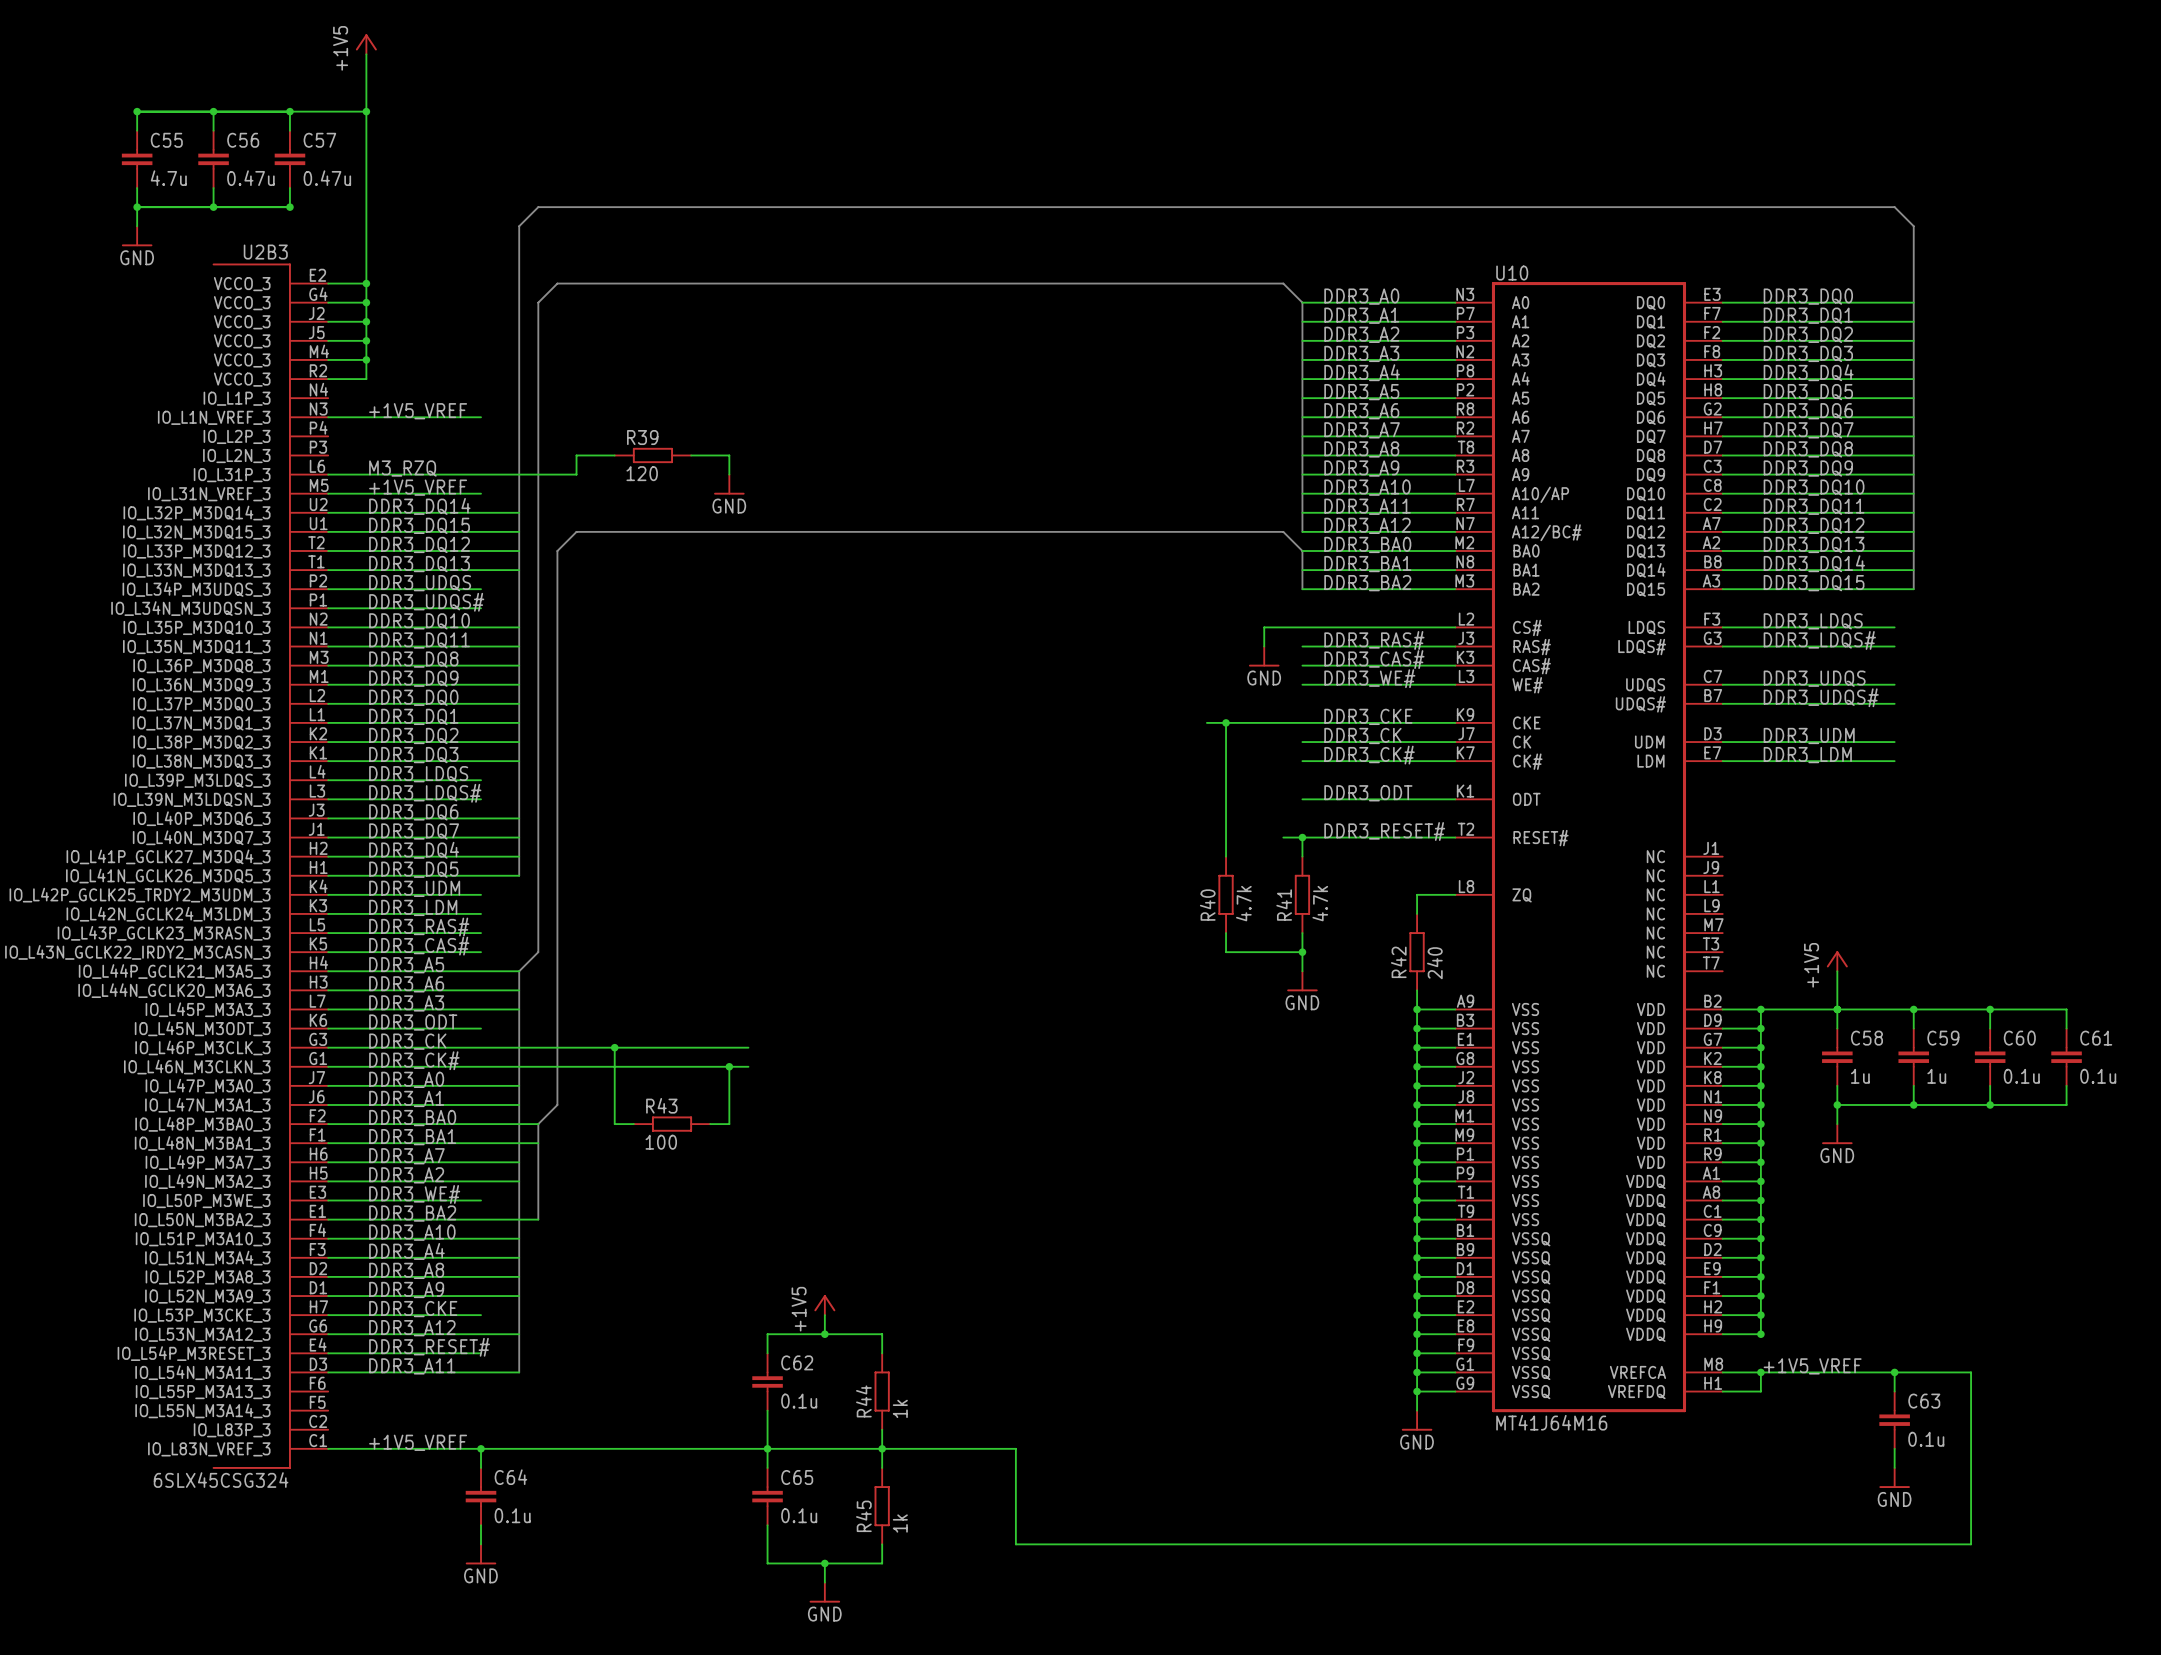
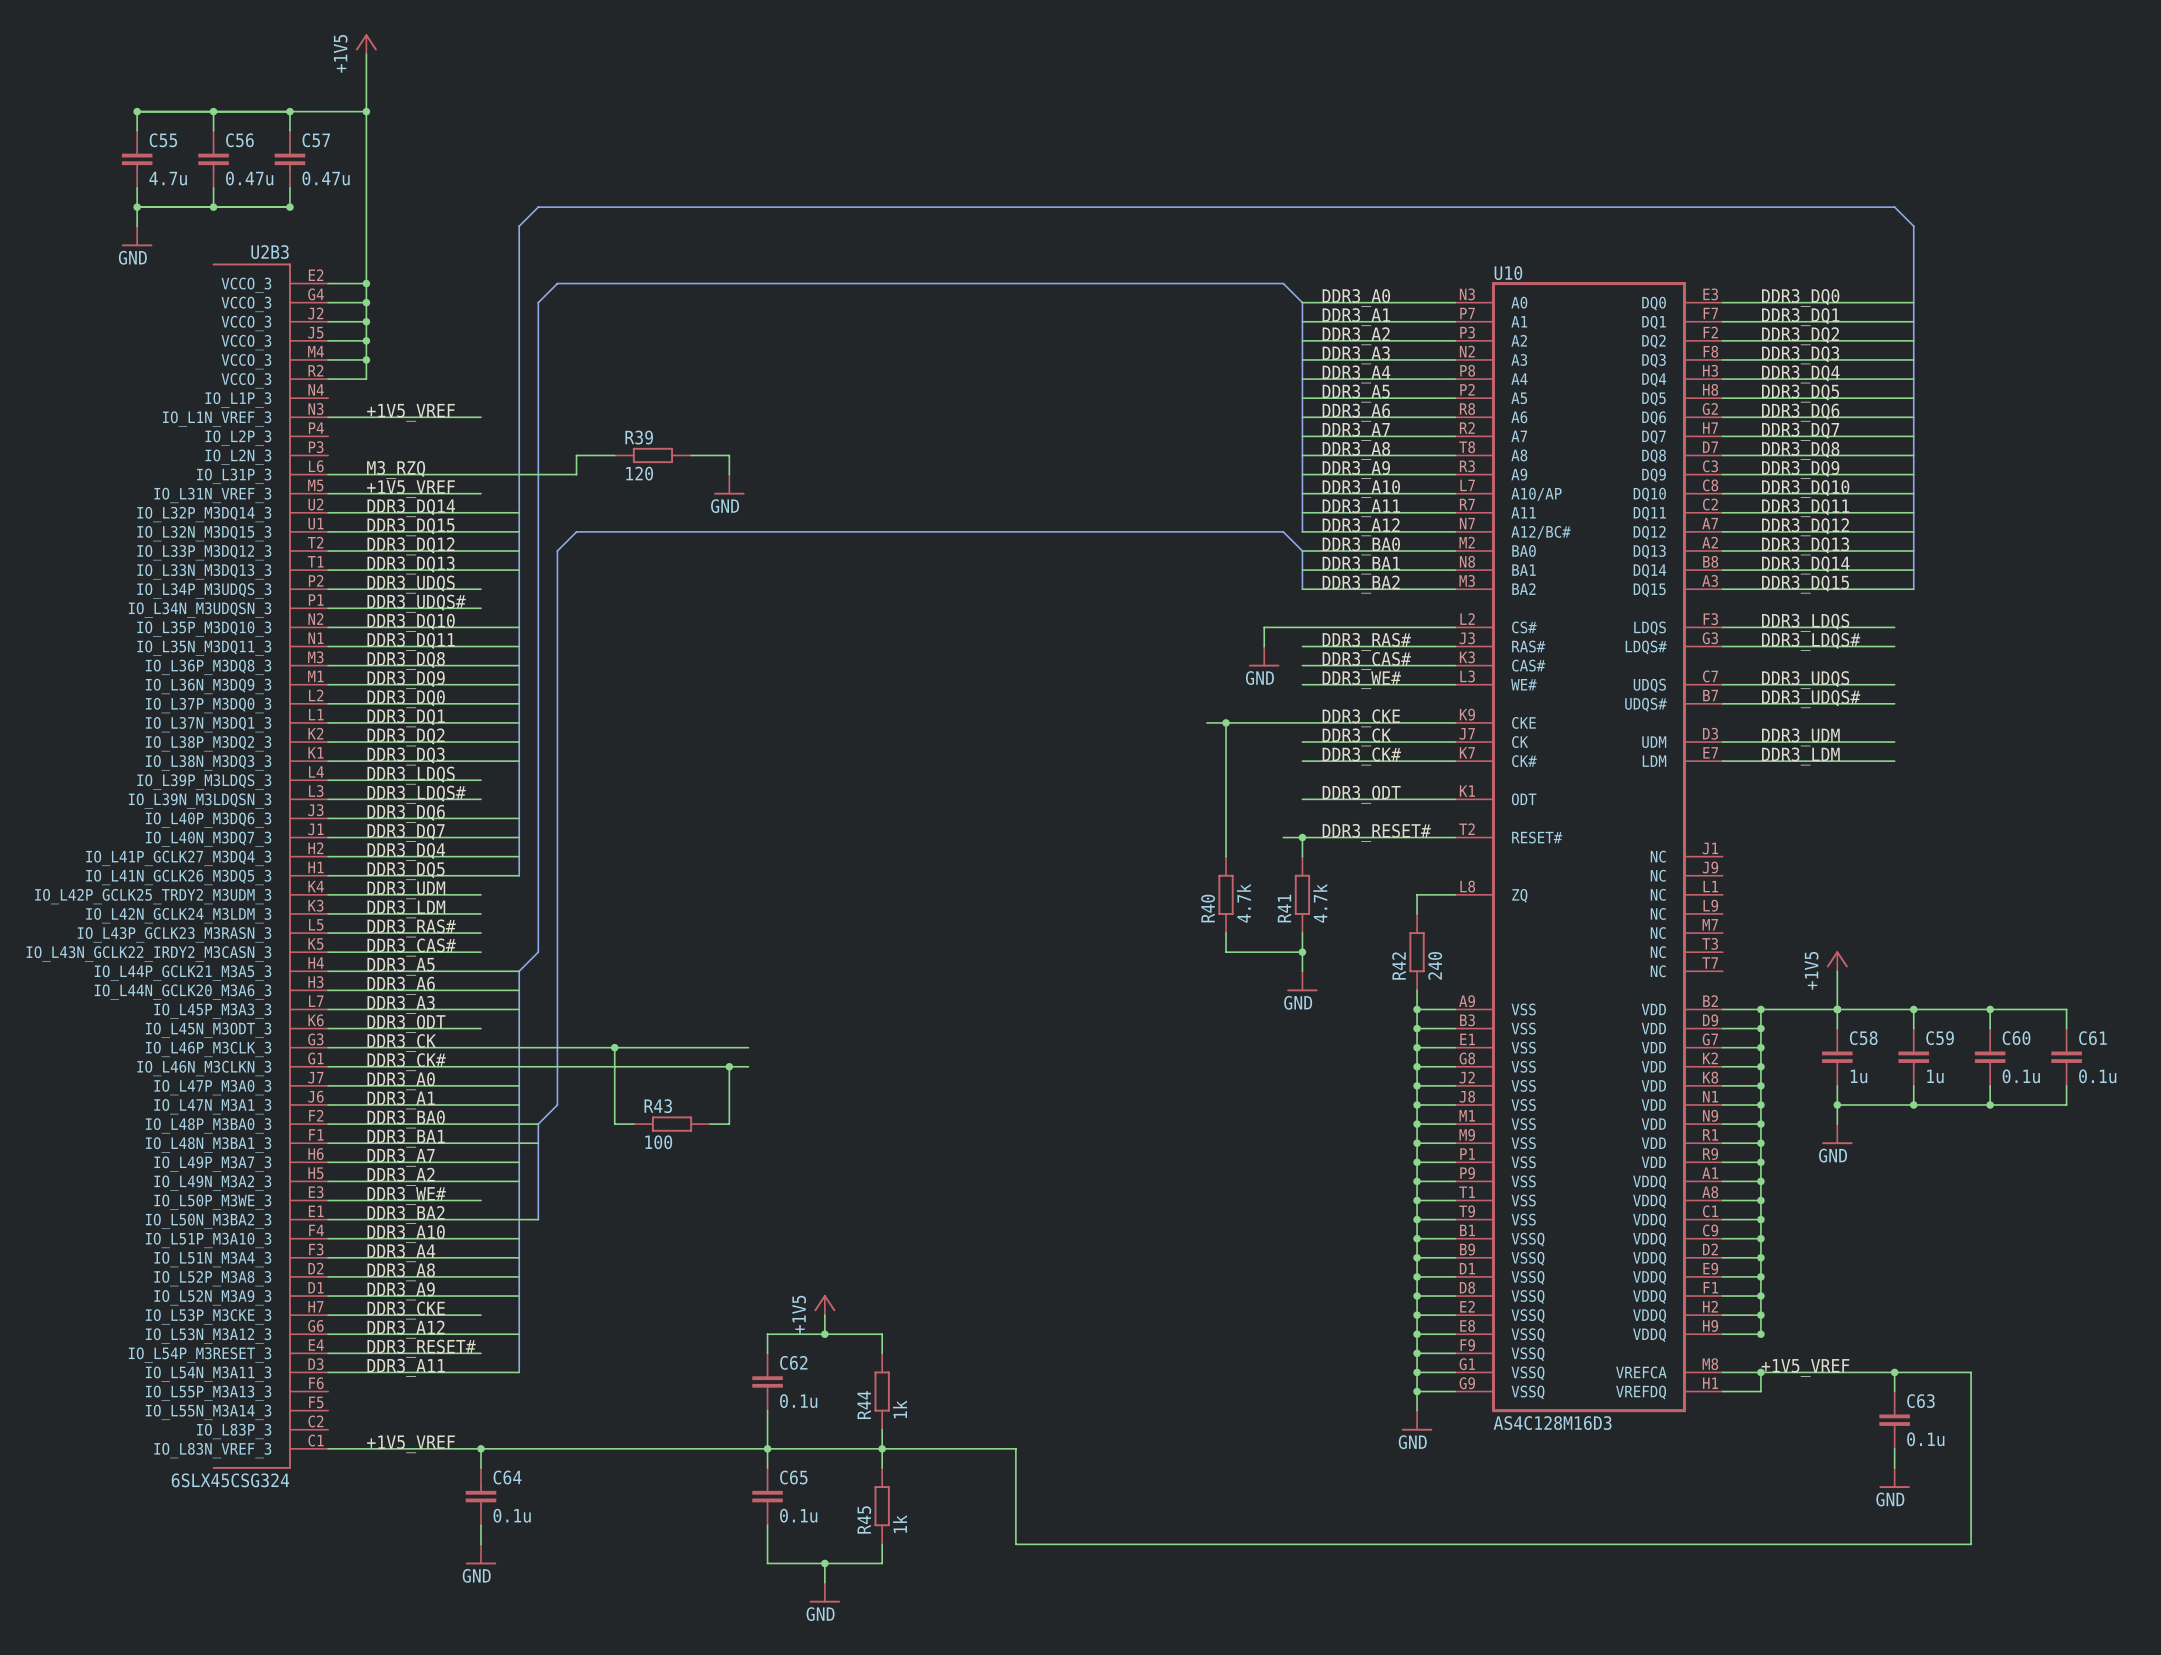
U10 value: MT41J64M16 (1551, 1422) -> AS4C128M16D3 (1552, 1423)

